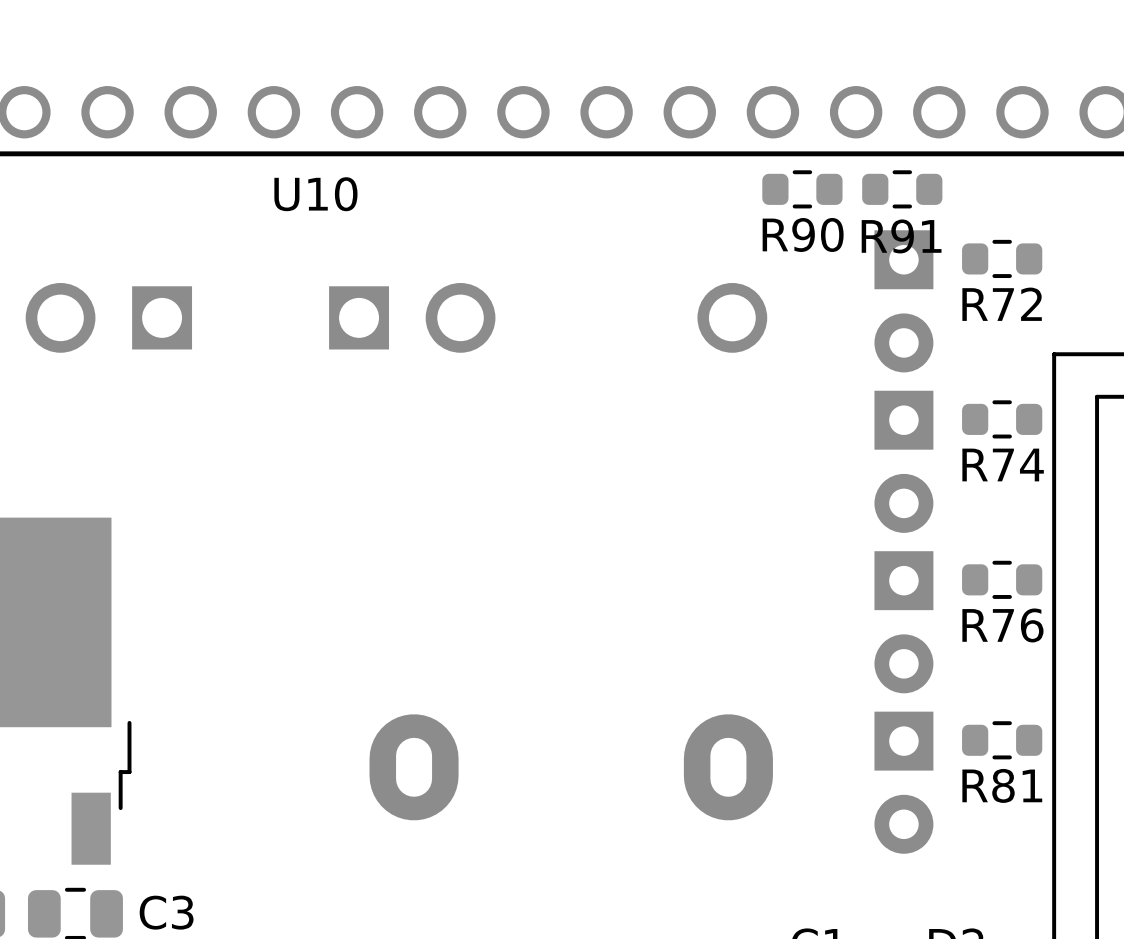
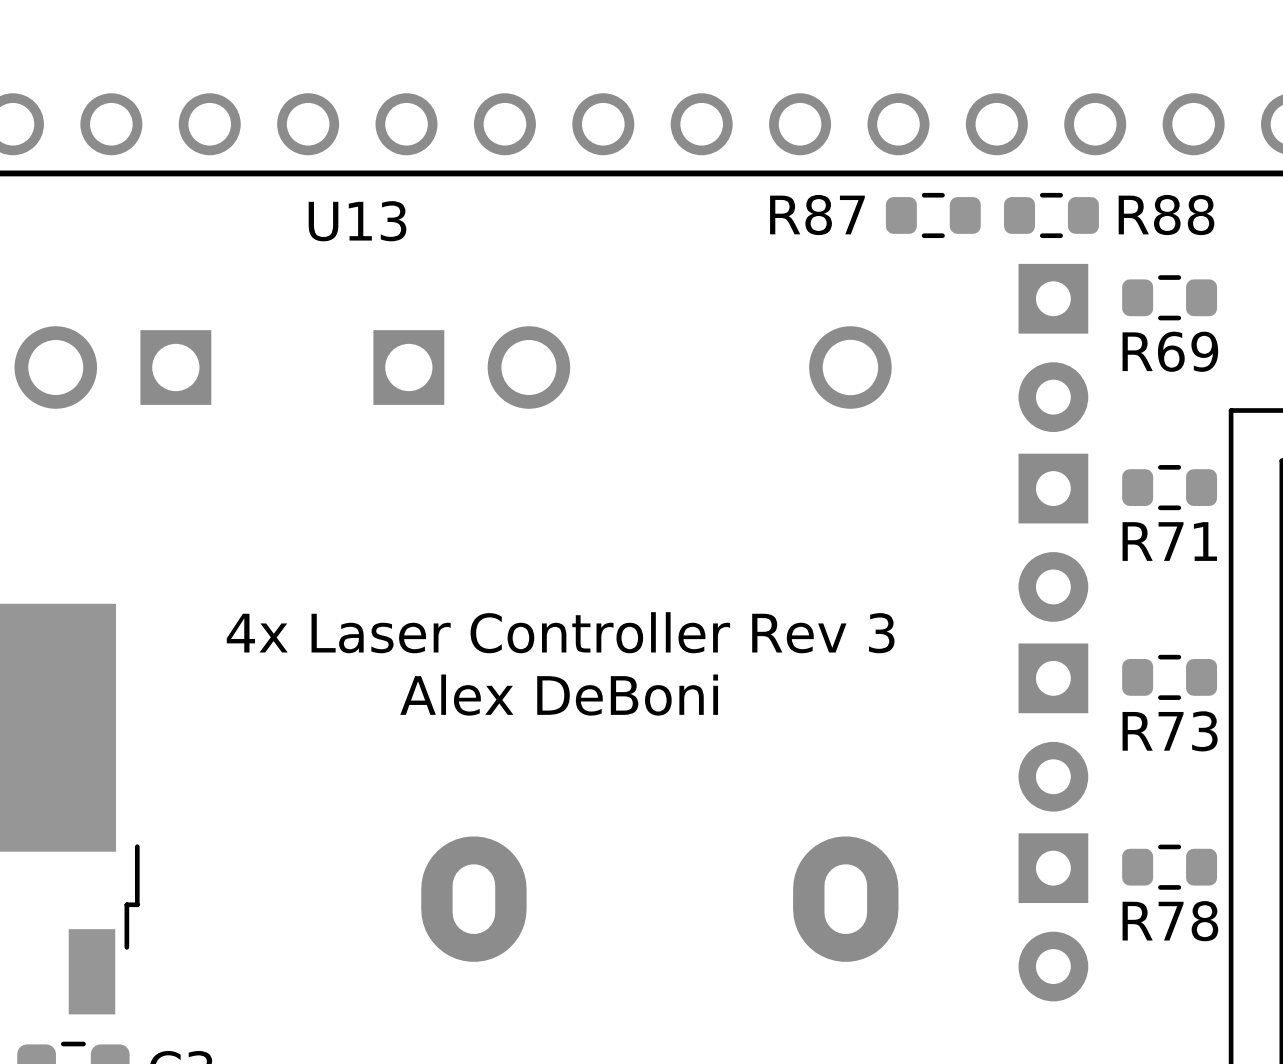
U10 name: U10 (315, 194) -> U13 (357, 221)
R90 name: R90 (803, 234) -> R87 (817, 215)
R91 name: R91 (901, 236) -> R88 (1166, 215)
R72 name: R72 (1002, 304) -> R69 (1170, 351)
R74 name: R74 (1003, 464) -> R71 (1169, 541)
text: none -> 4x Laser Controller Rev 3 (560, 632)
text: none -> Alex DeBoni (559, 695)
R76 name: R76 (1002, 625) -> R73 (1170, 731)
R81 name: R81 (1002, 785) -> R78 (1170, 921)

